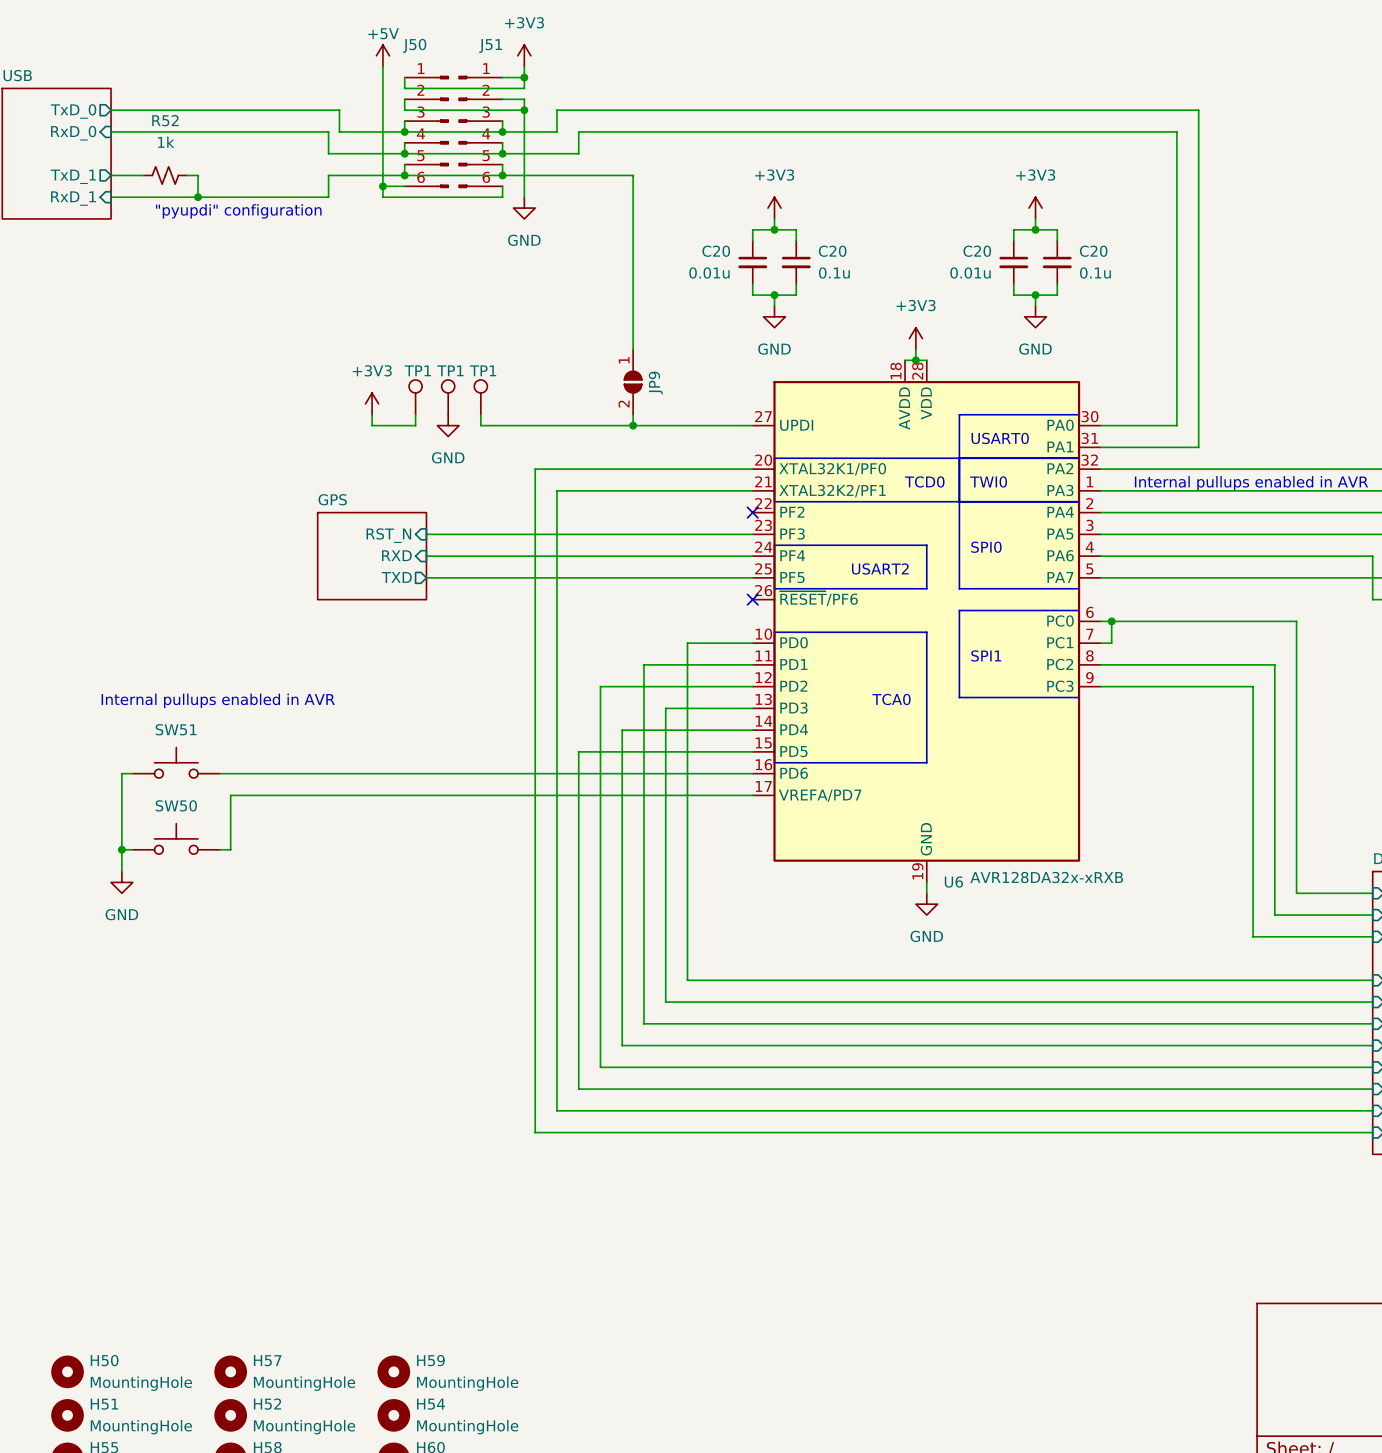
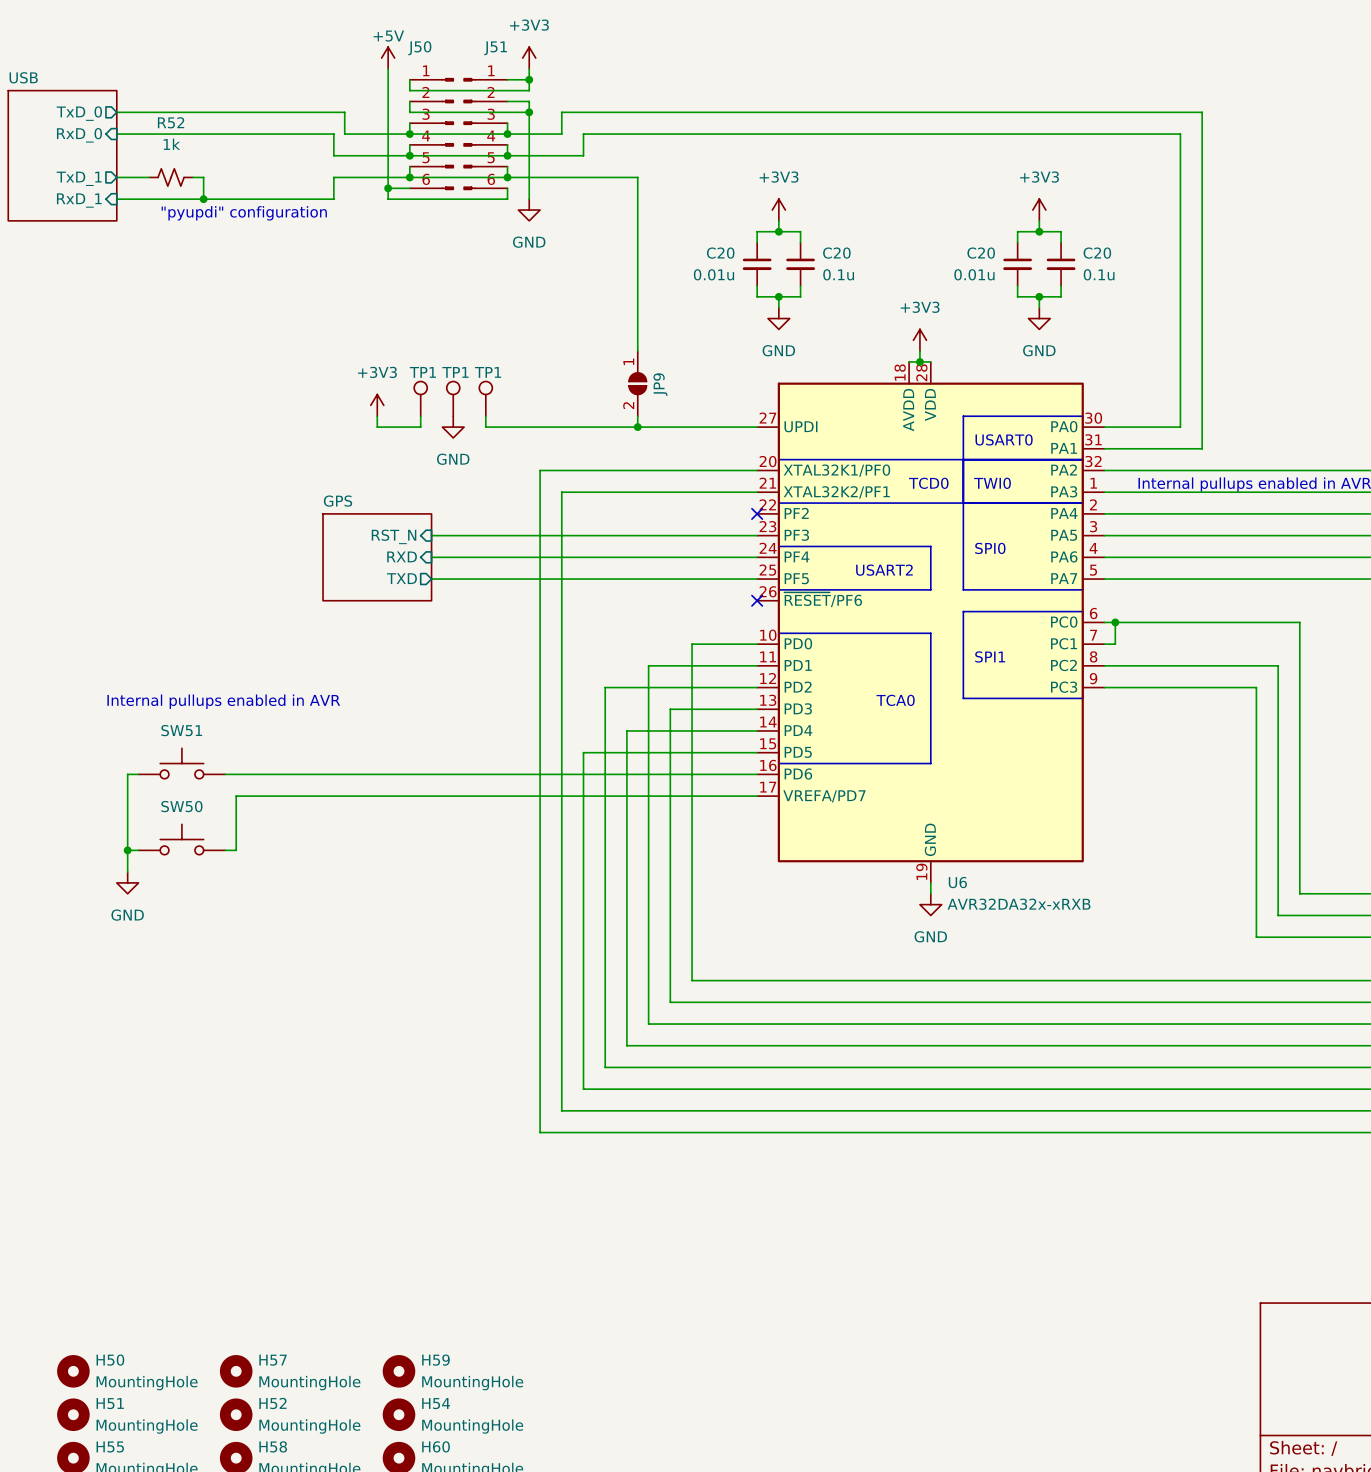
U6 value: AVR128DA32x-xRXB (1046, 877) -> AVR32DA32x-xRXB (1019, 904)

